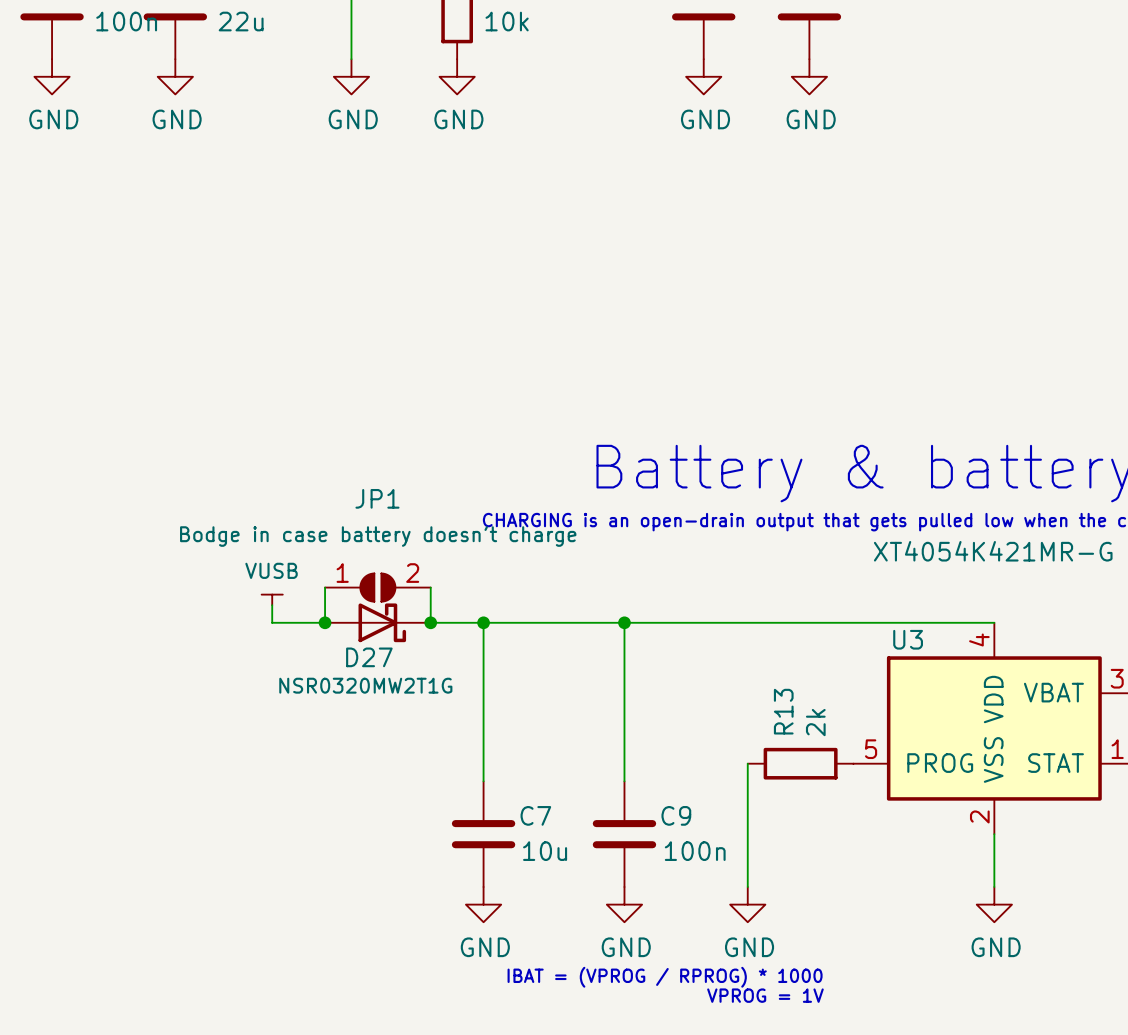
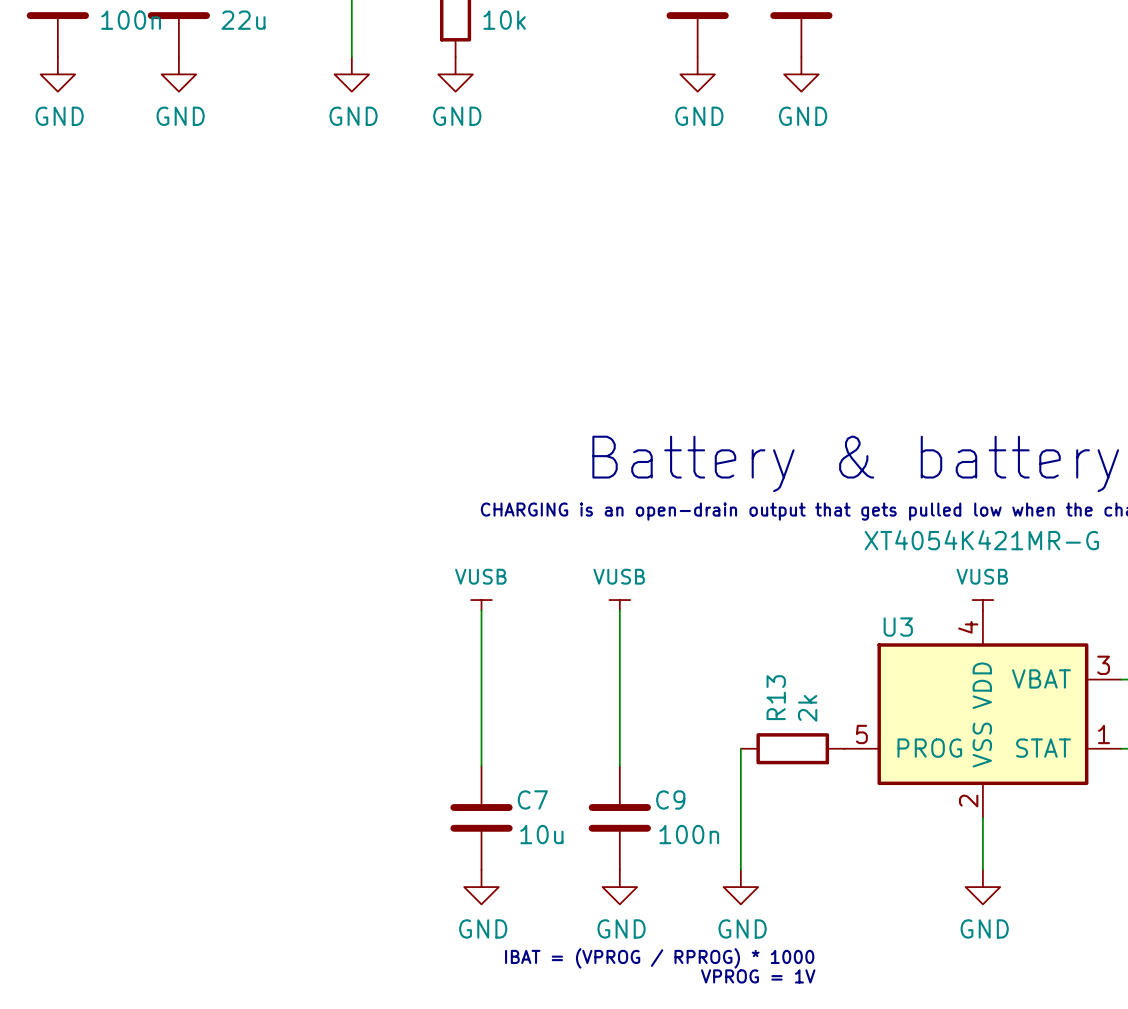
wire: (325, 587) (325, 622) (272, 622) (272, 605) -> none
JP1: Bodge in case battery doesn't charge (377, 587) -> none
wire: (430, 587) (430, 622) (994, 622) -> none
power symbol: VUSB (272, 599) -> none
power symbol: none -> VUSB (481, 605)
power symbol: none -> VUSB (619, 605)
power symbol: none -> VUSB (982, 605)
junction: (325, 622) -> none
D27: NSR0320MW2T1G (377, 622) -> none
junction: (430, 622) -> none
junction: (483, 622) -> none
junction: (624, 622) -> none

